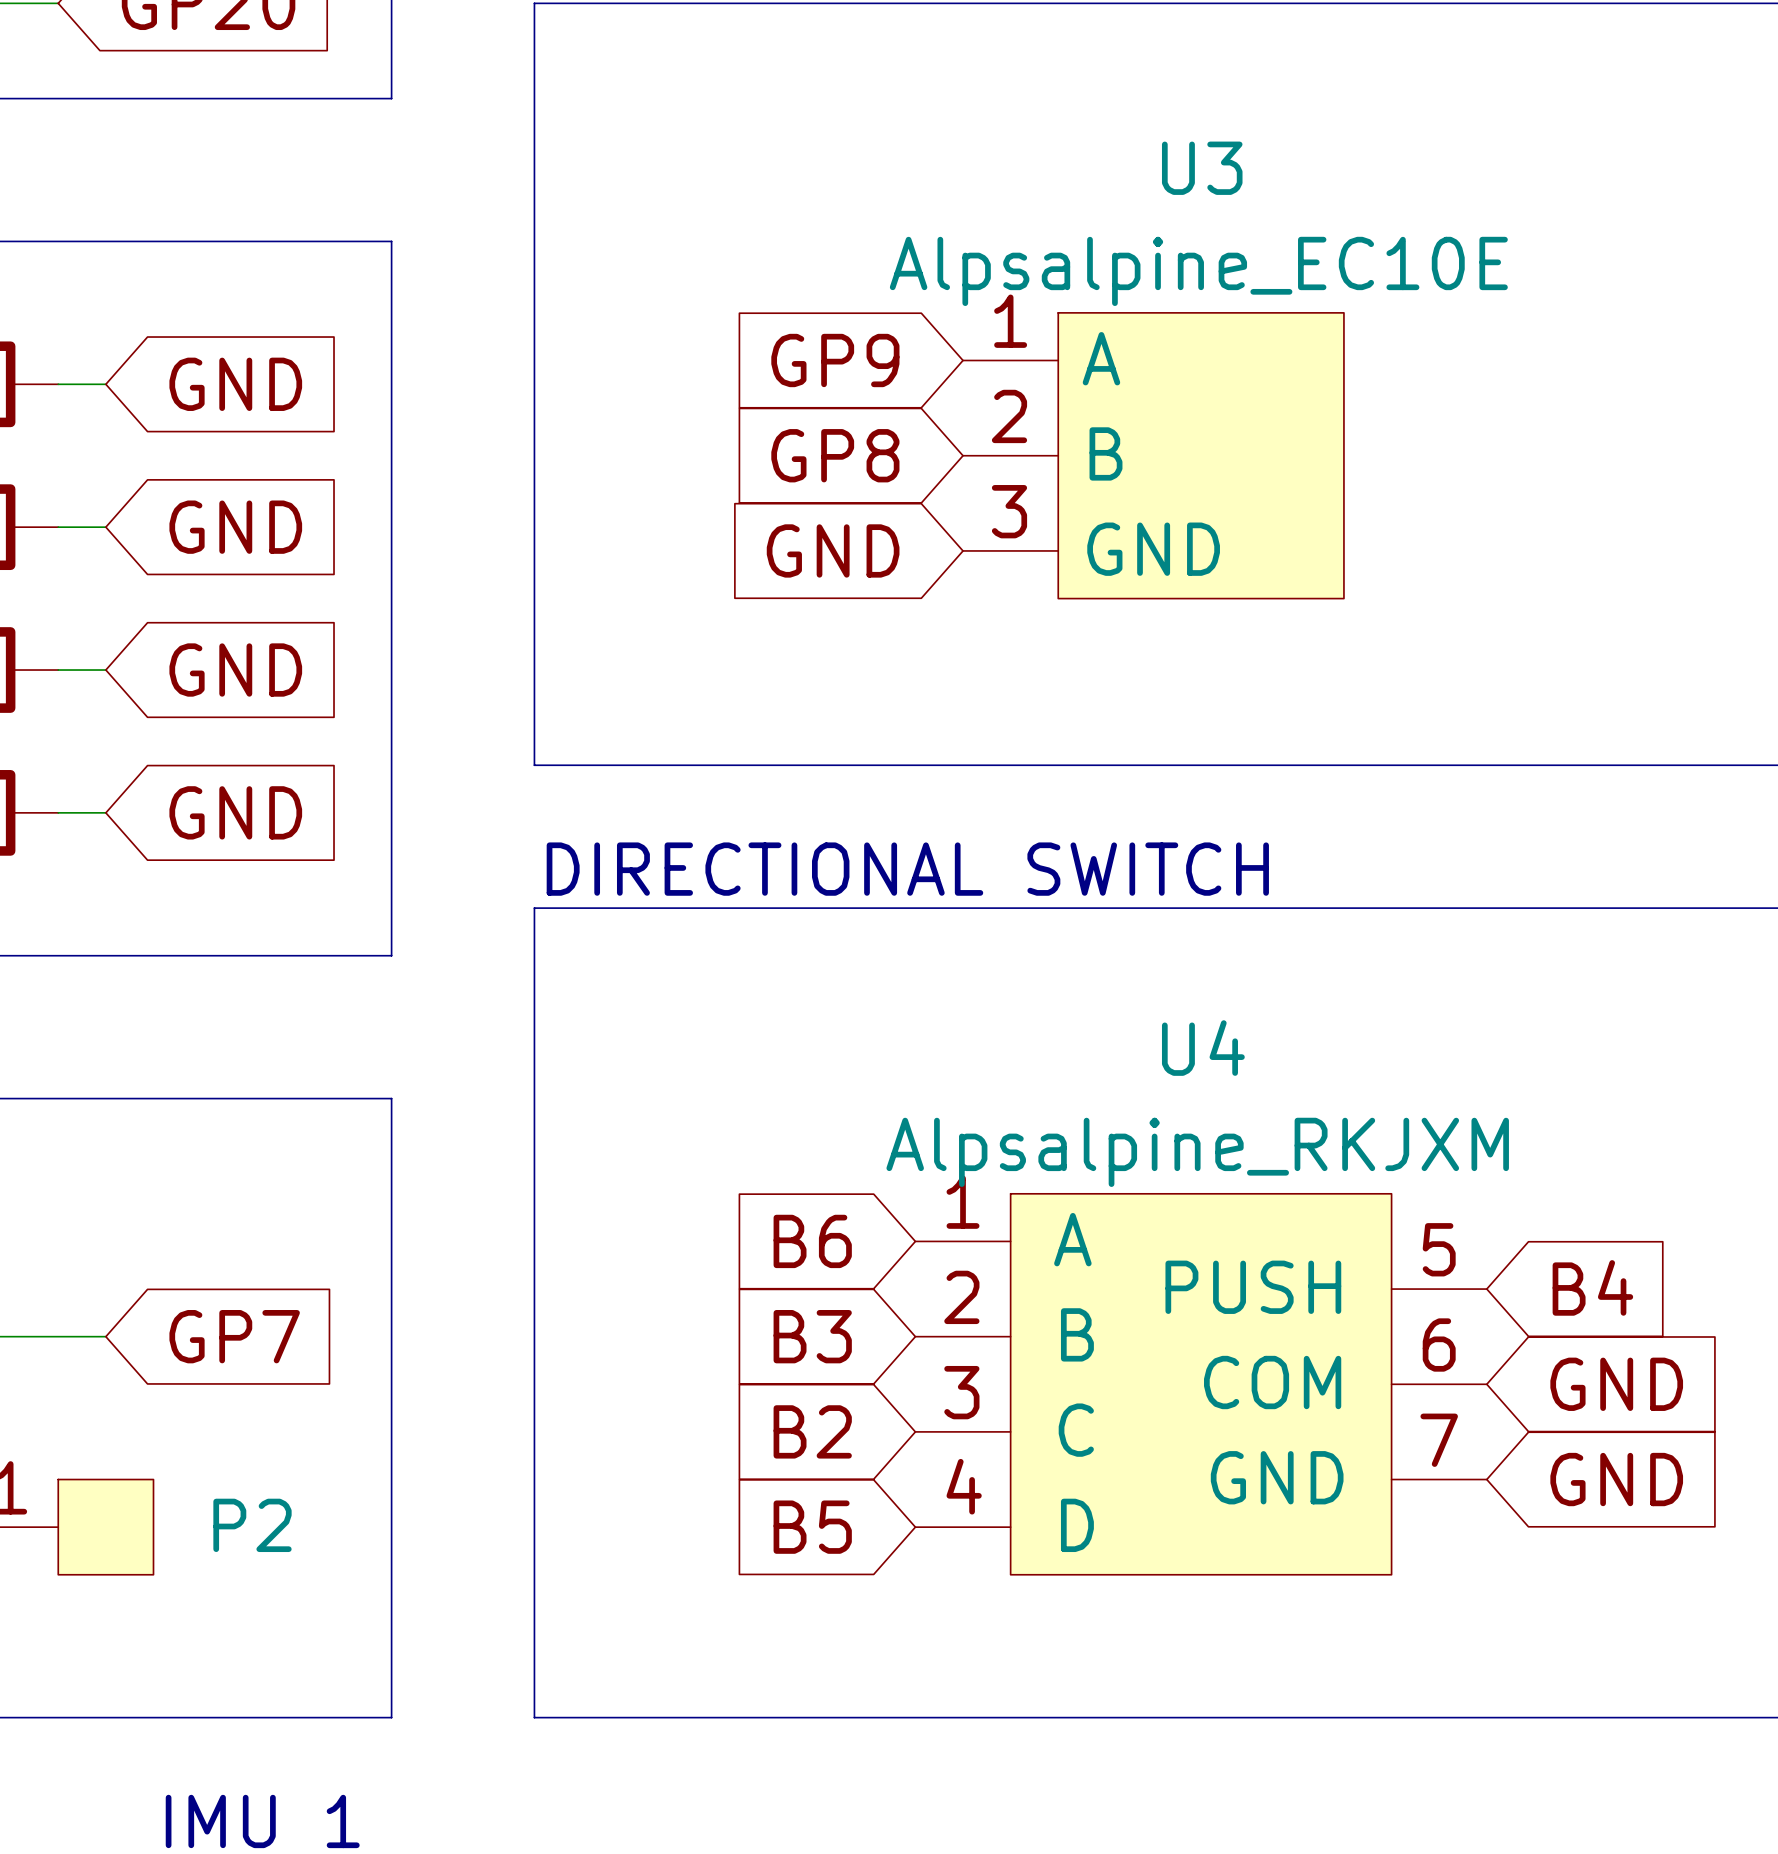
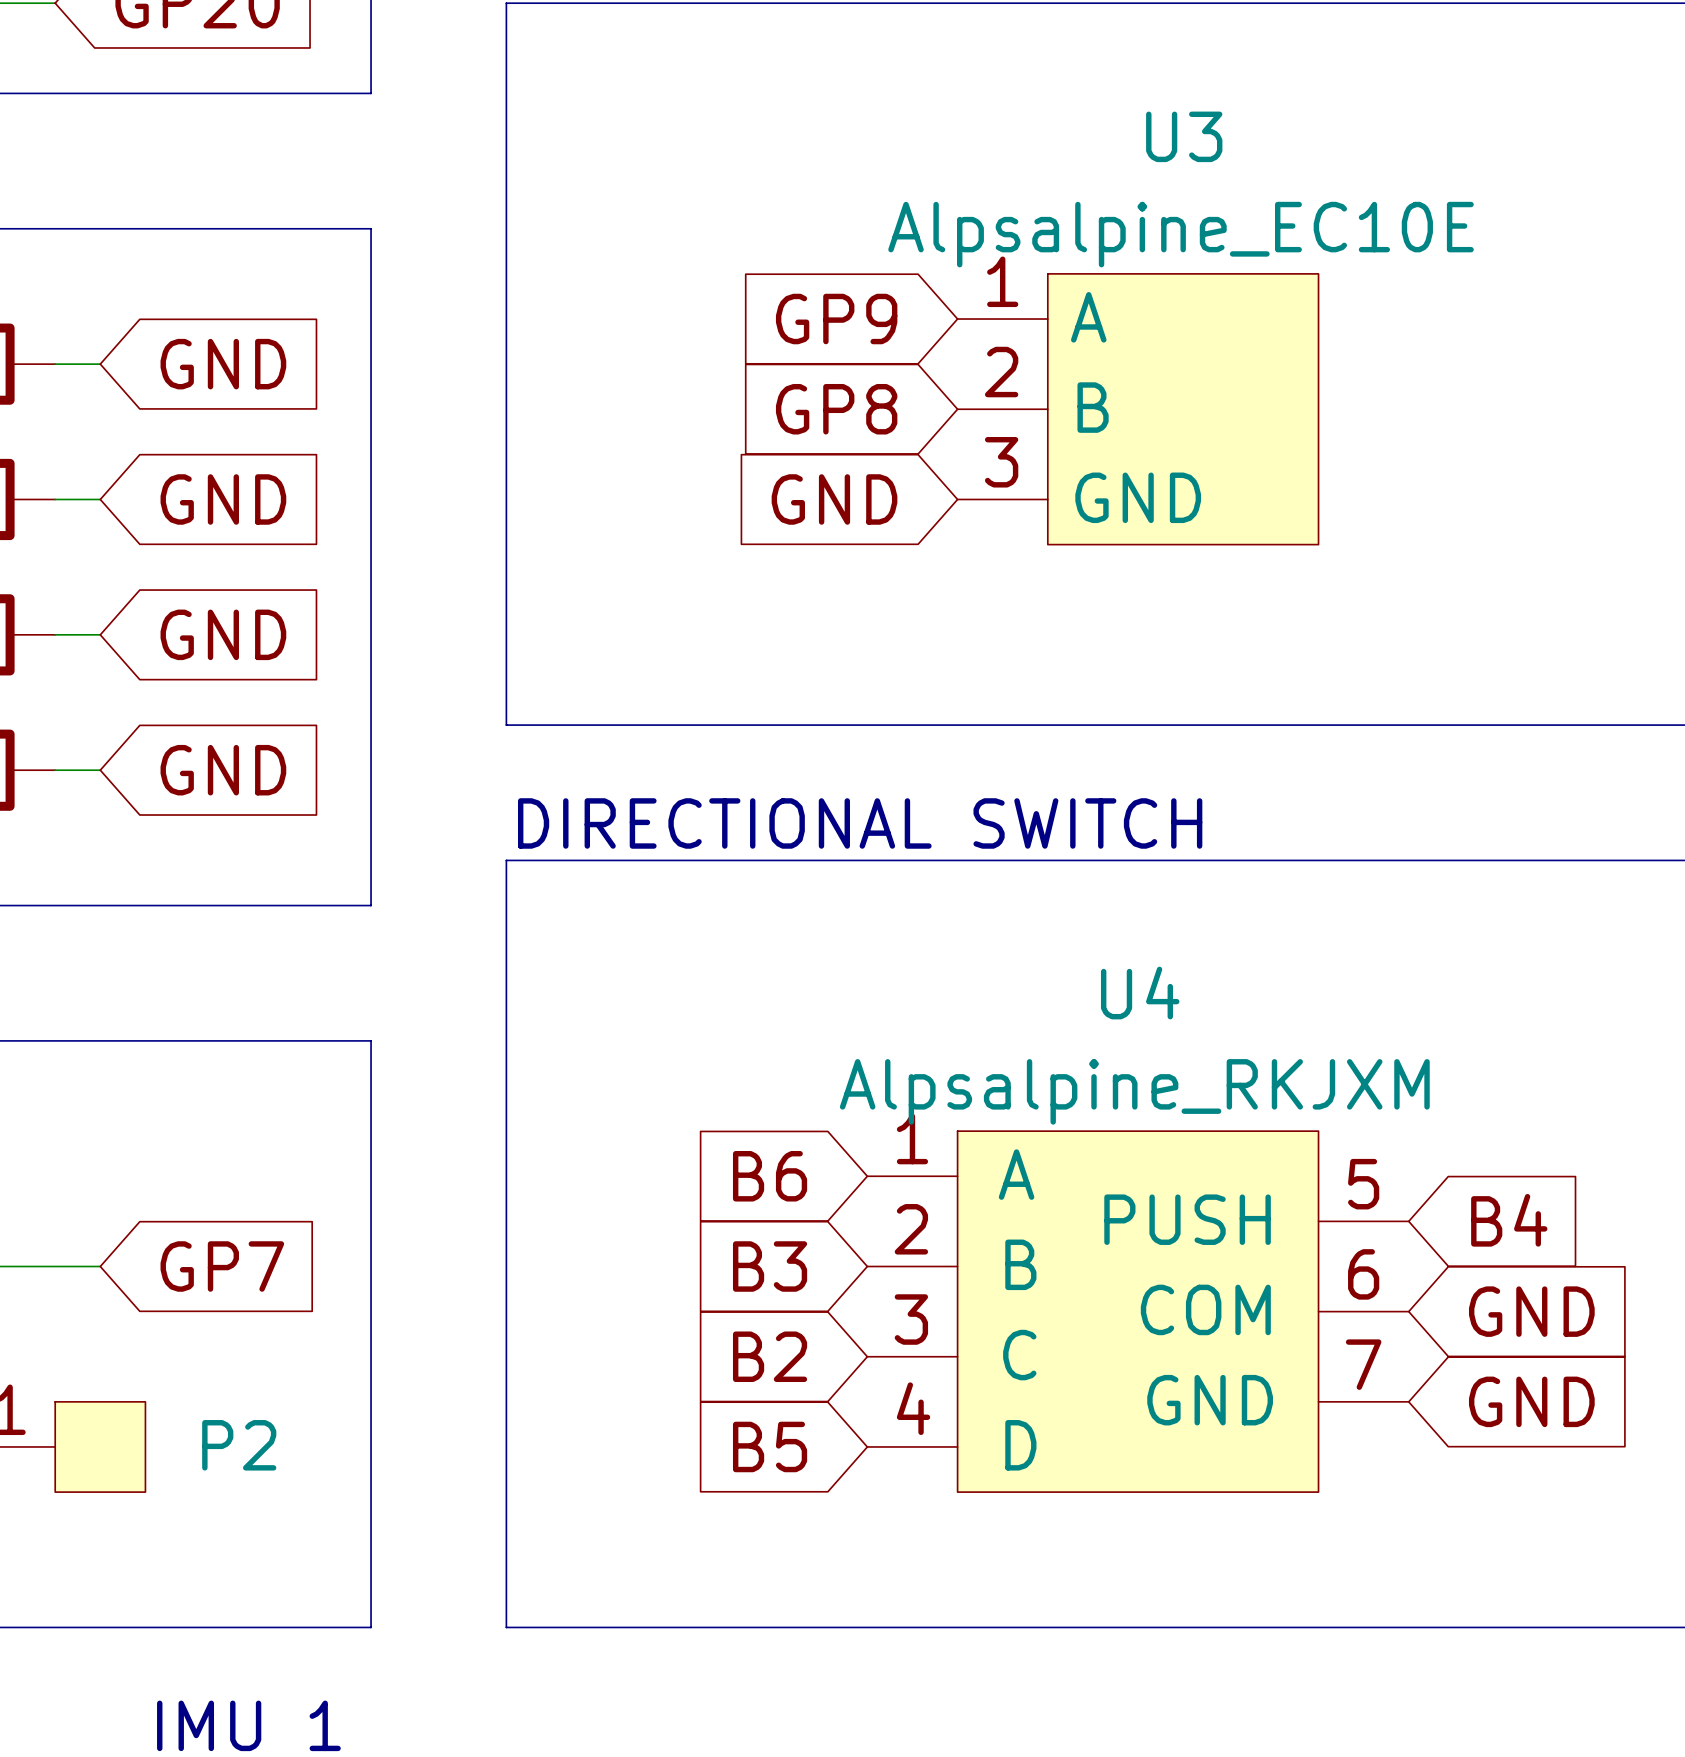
global label position: GP9 (835, 360) -> GP9 (836, 319)
global label position: GP8 (835, 455) -> GP8 (836, 409)
U3 position: (1153, 455) -> (1138, 409)
global label position: GND (833, 550) -> GND (834, 499)

